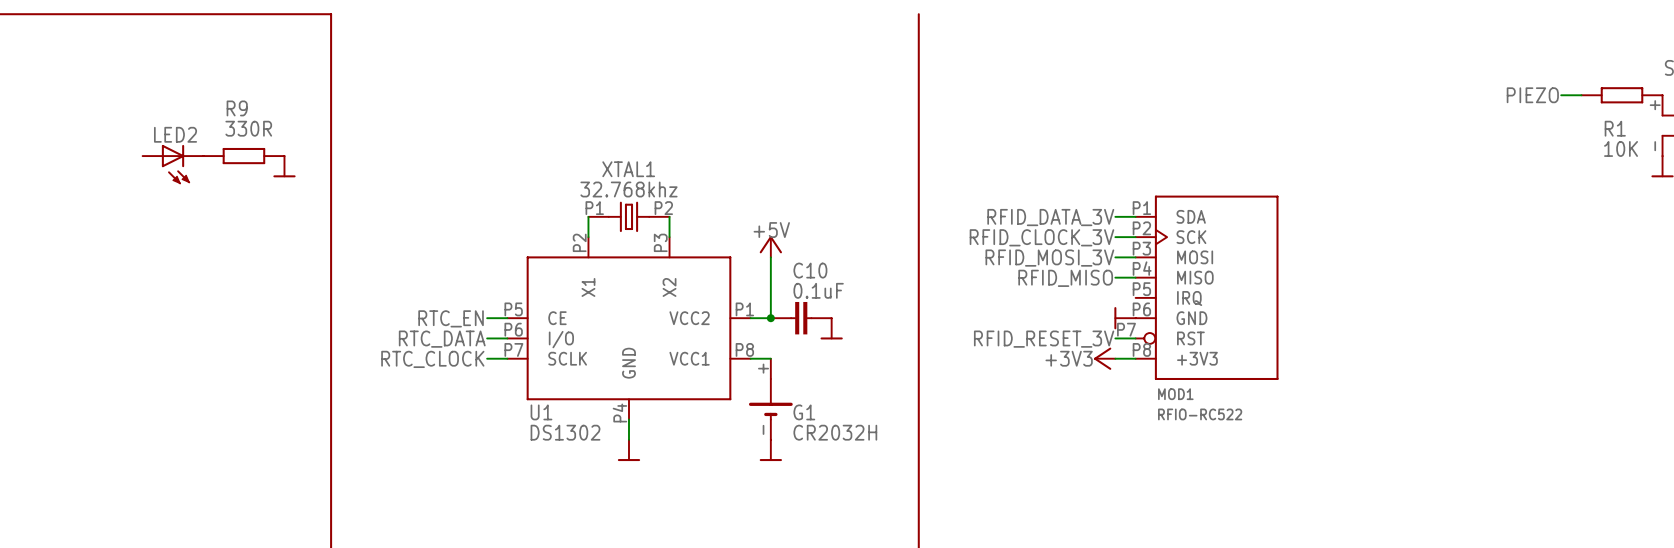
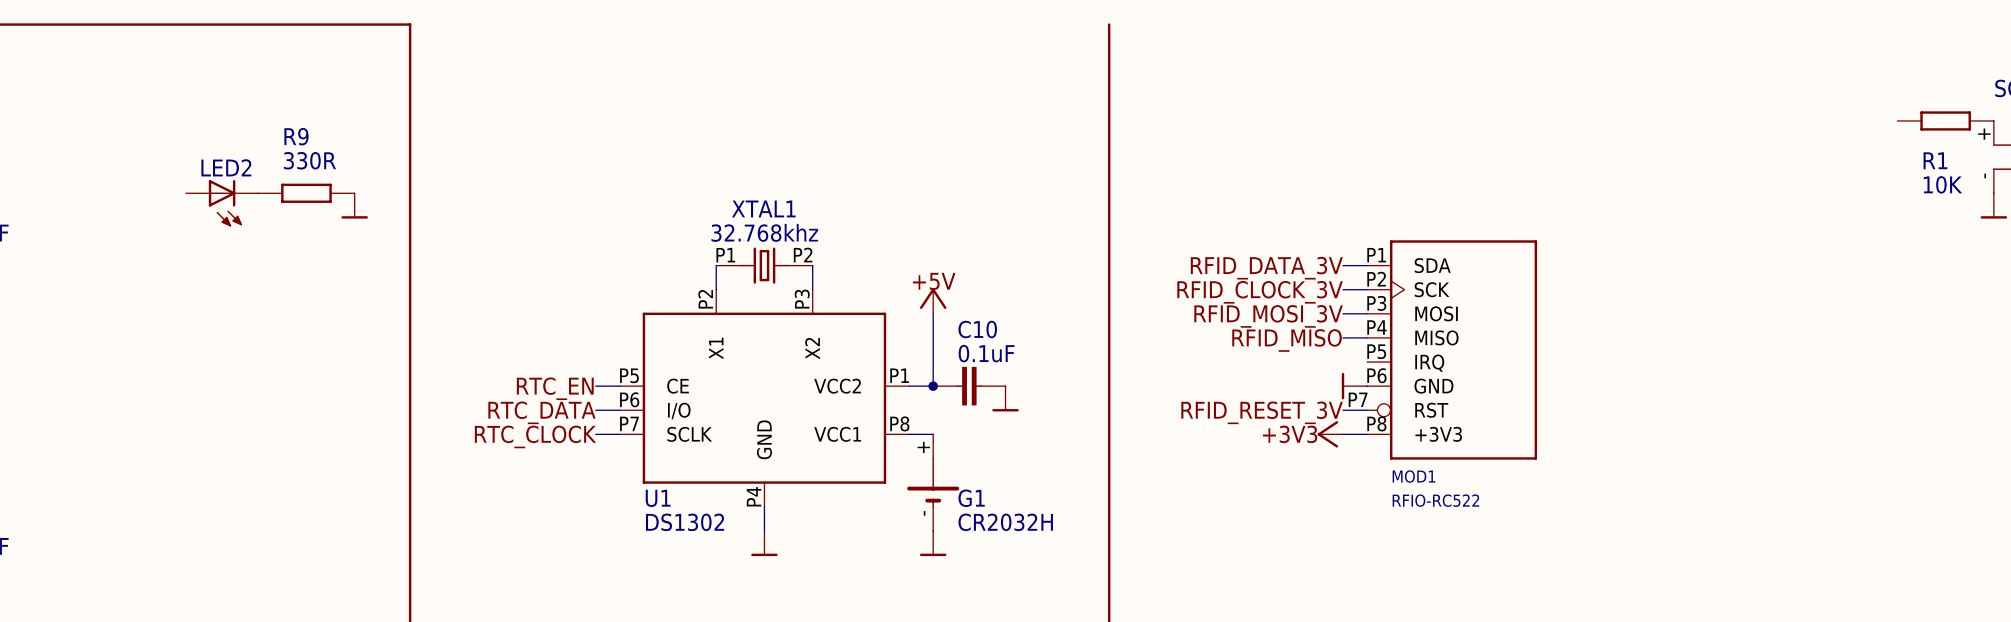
label: PIEZO (1532, 95) -> none
wire: (1561, 95) (1581, 95) -> none

